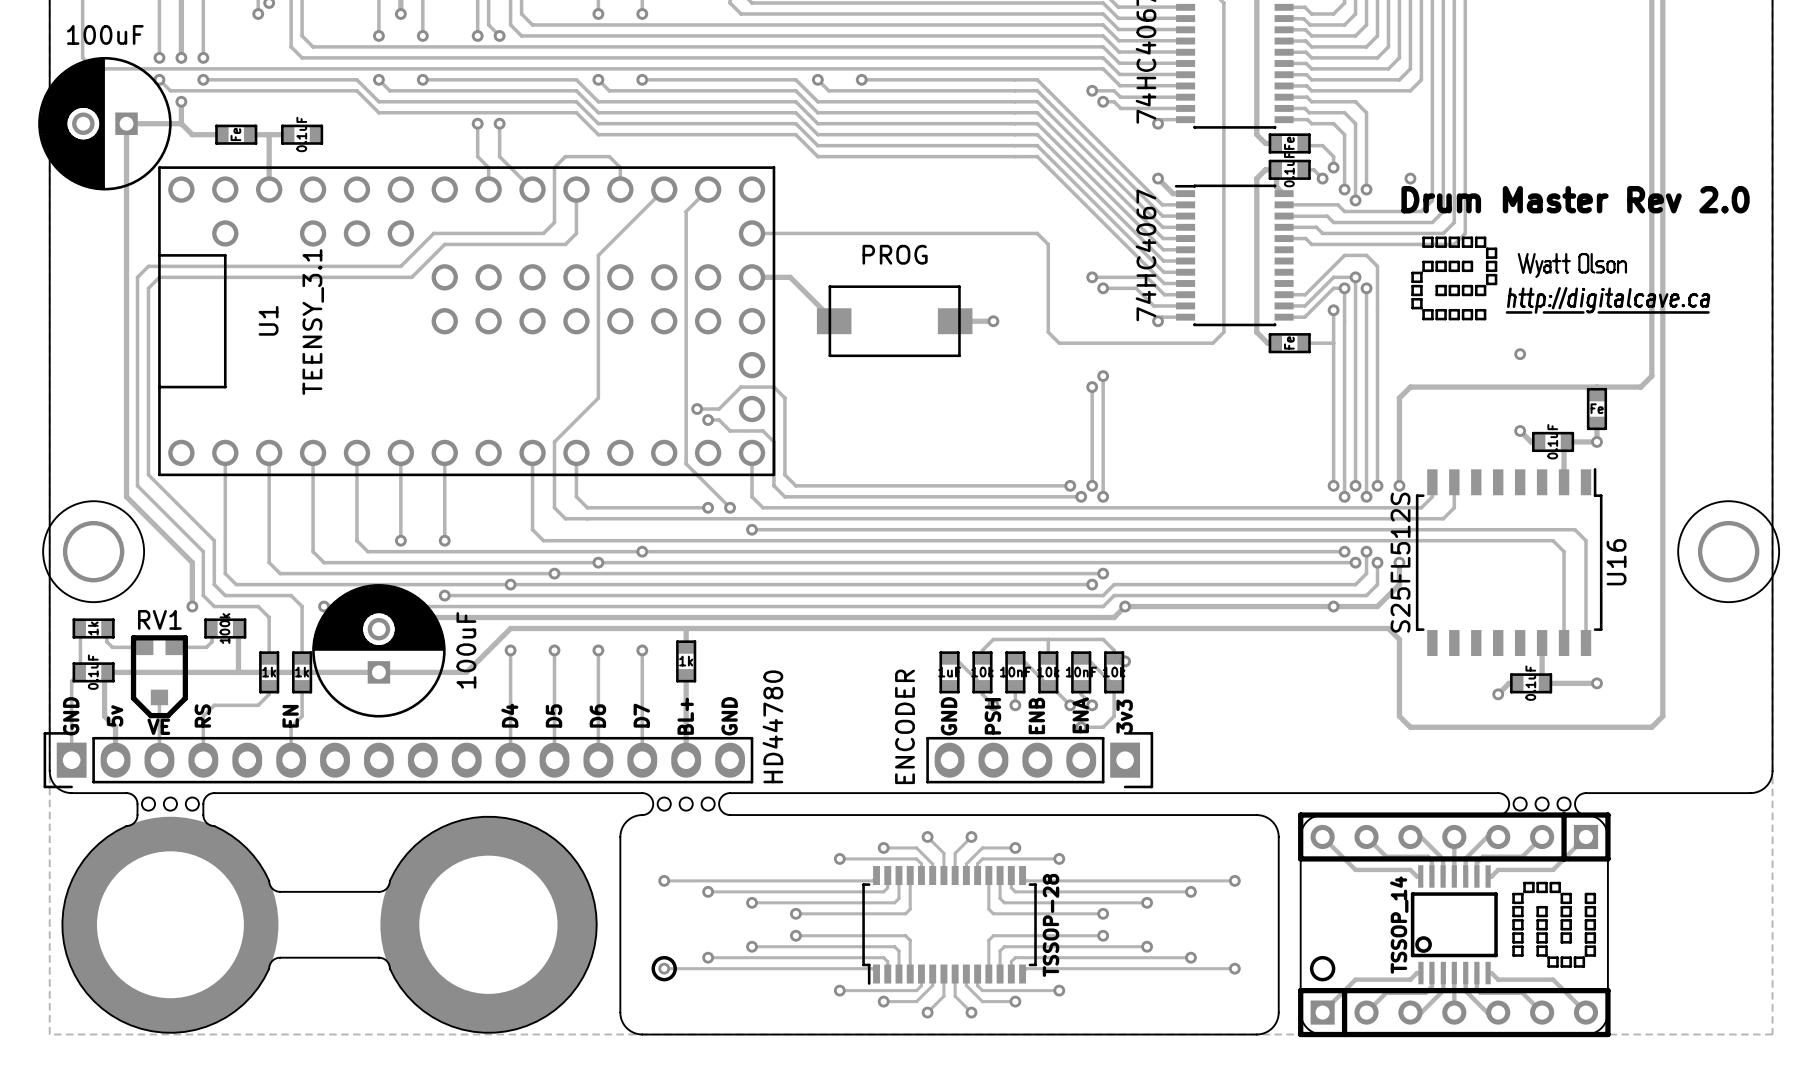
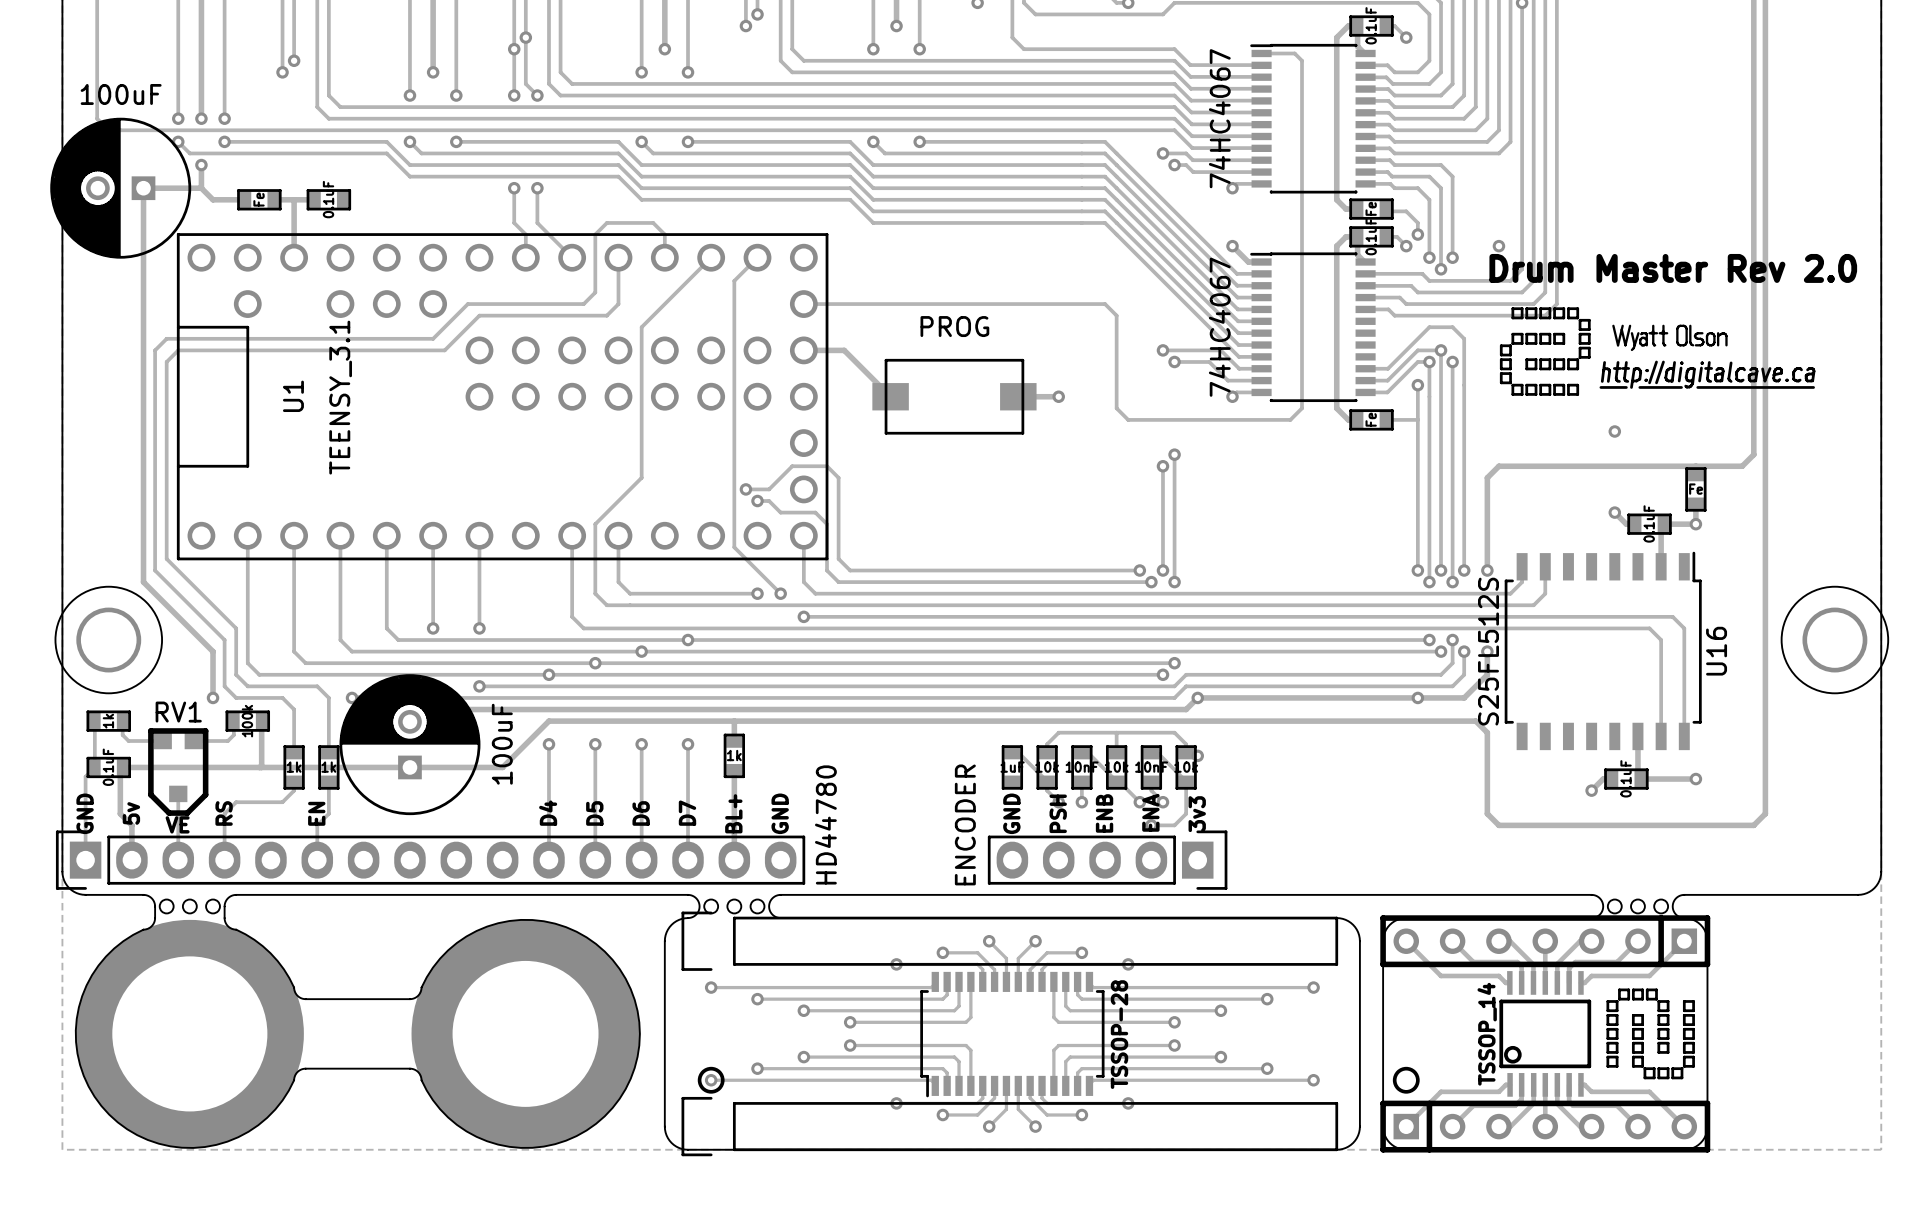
part: none -> (1009, 941)
part: none -> (1009, 1126)

